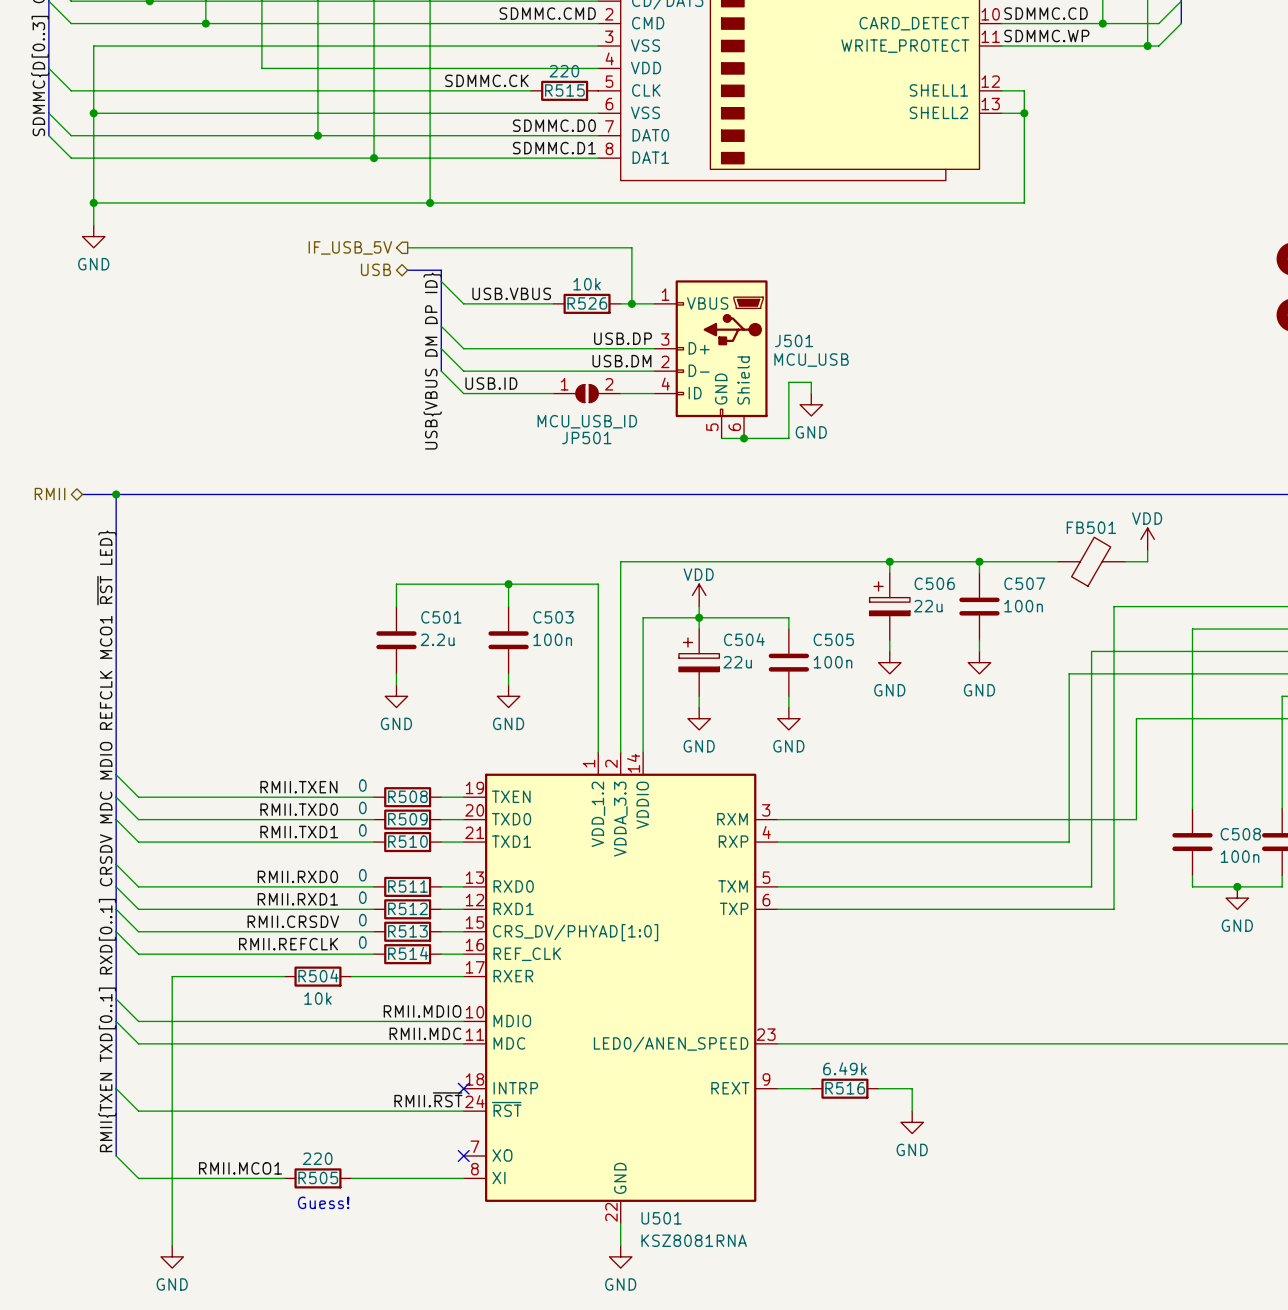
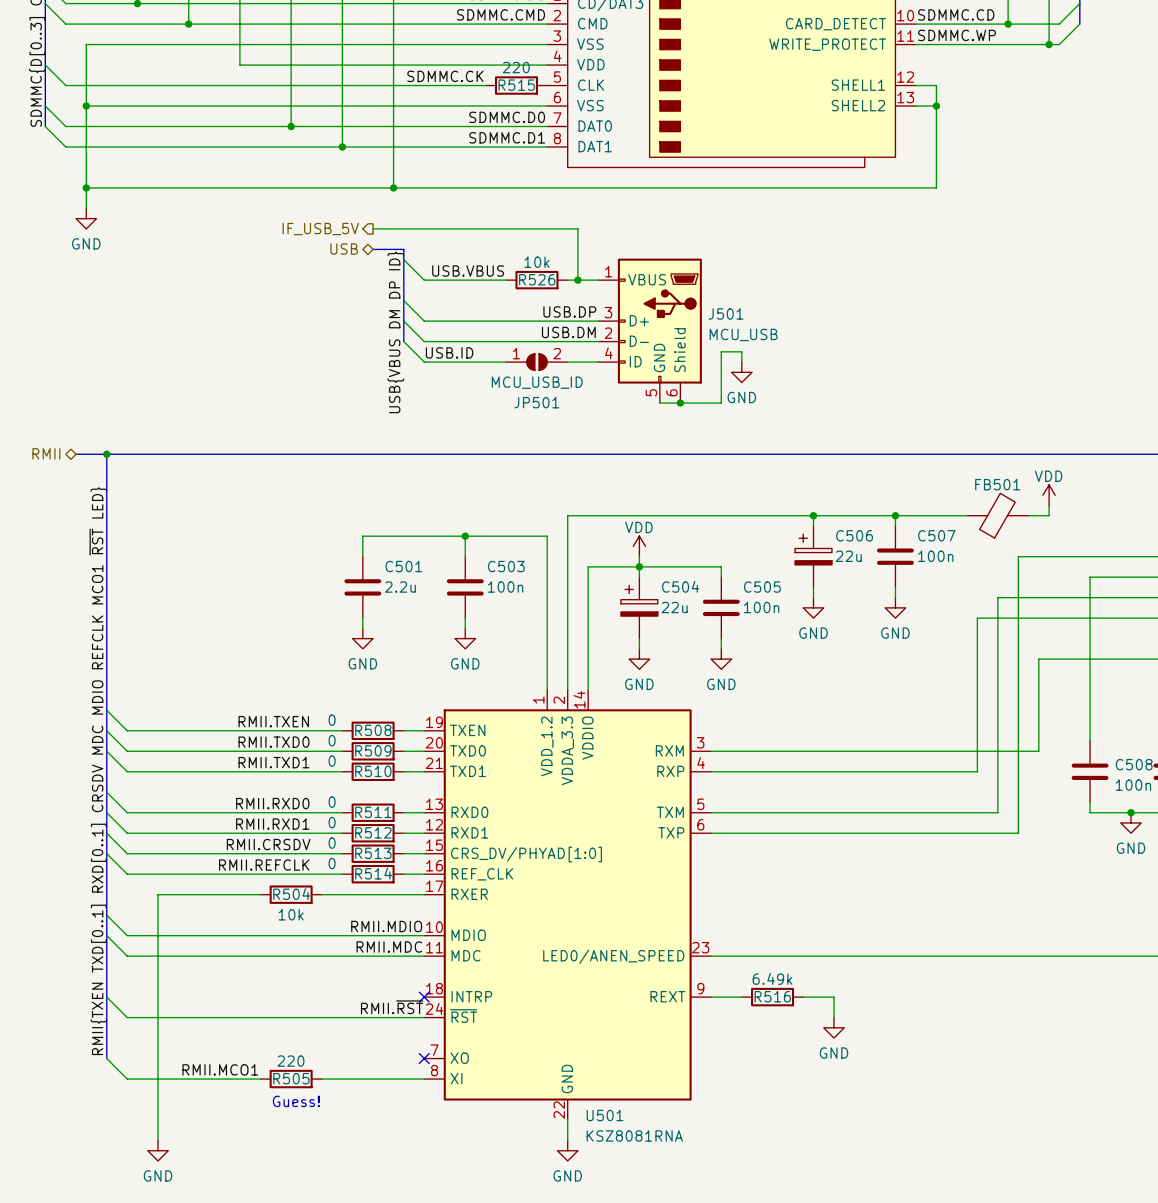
J501 text: MCU_USB (811, 360) -> none
J501 value: none -> MCU_USB (743, 334)
JP501 value: none -> MCU_USB_ID (537, 382)
JP501 text: MCU_USB_ID (587, 421) -> none

